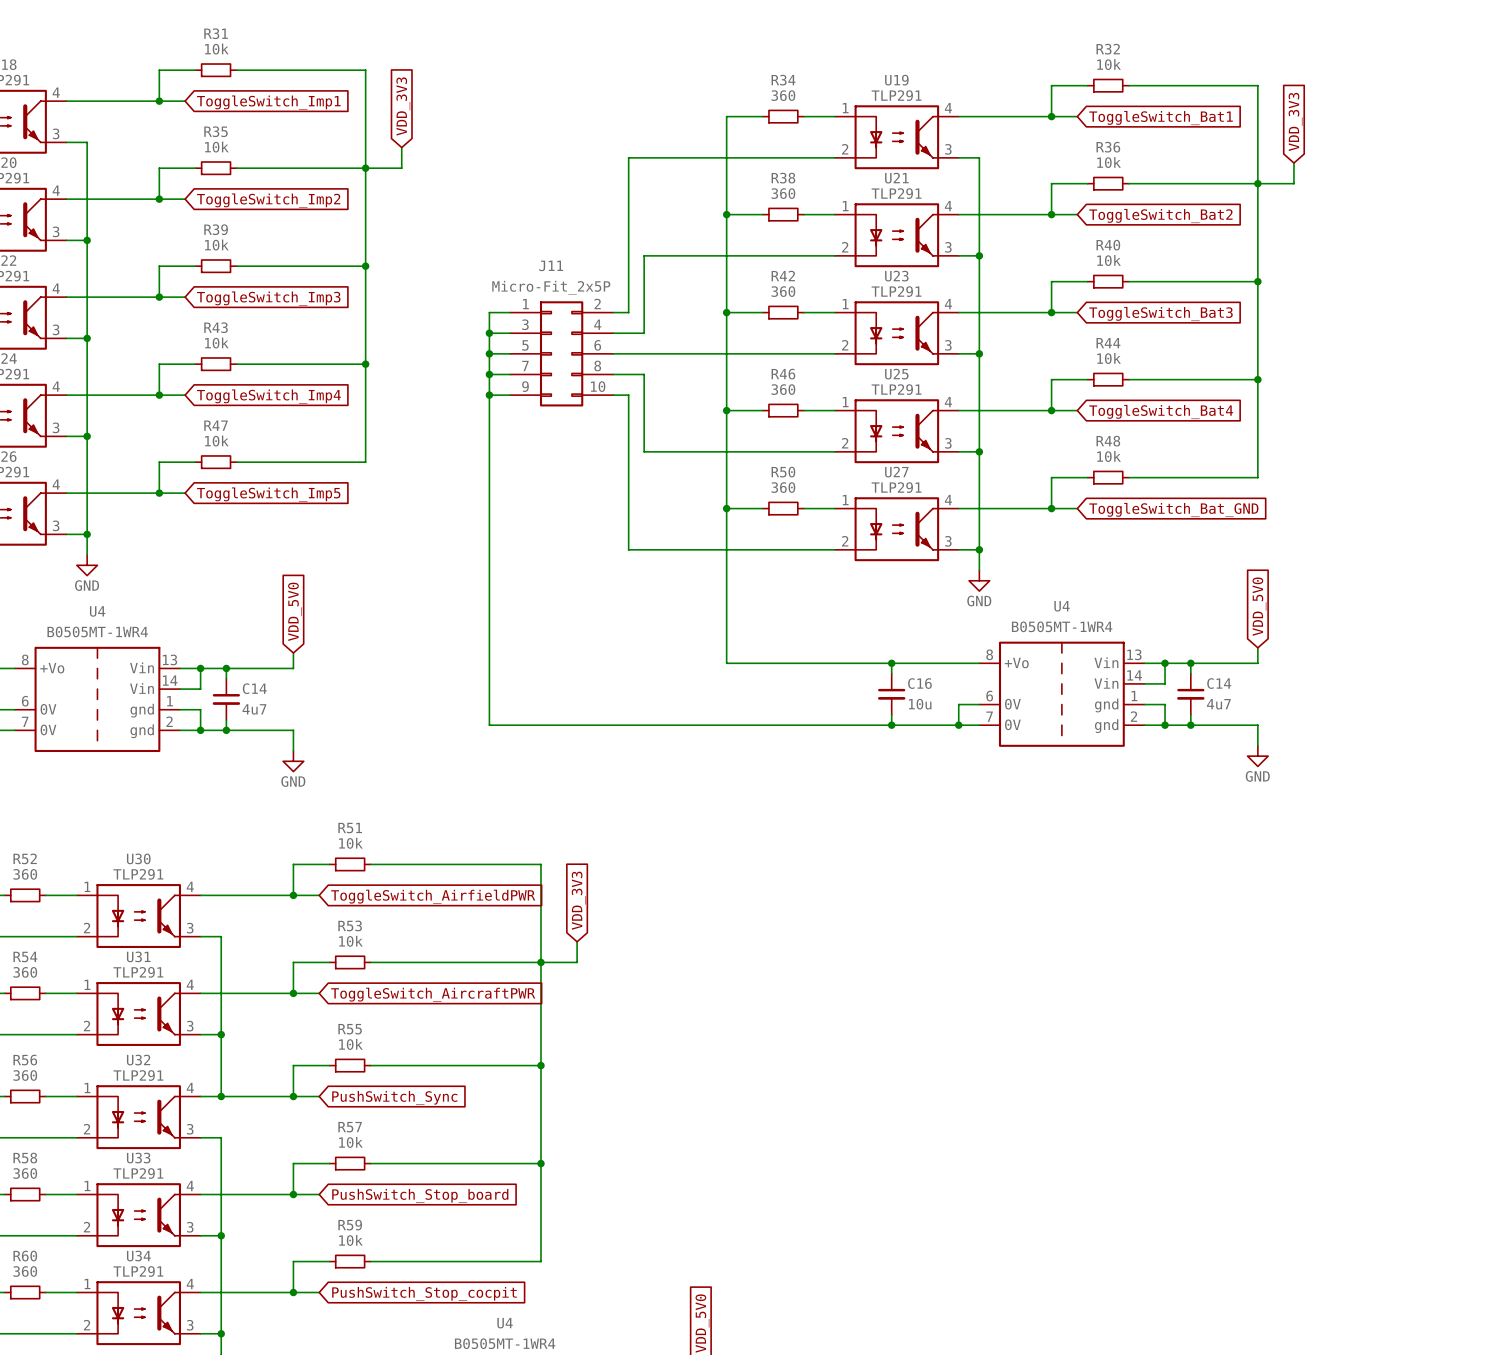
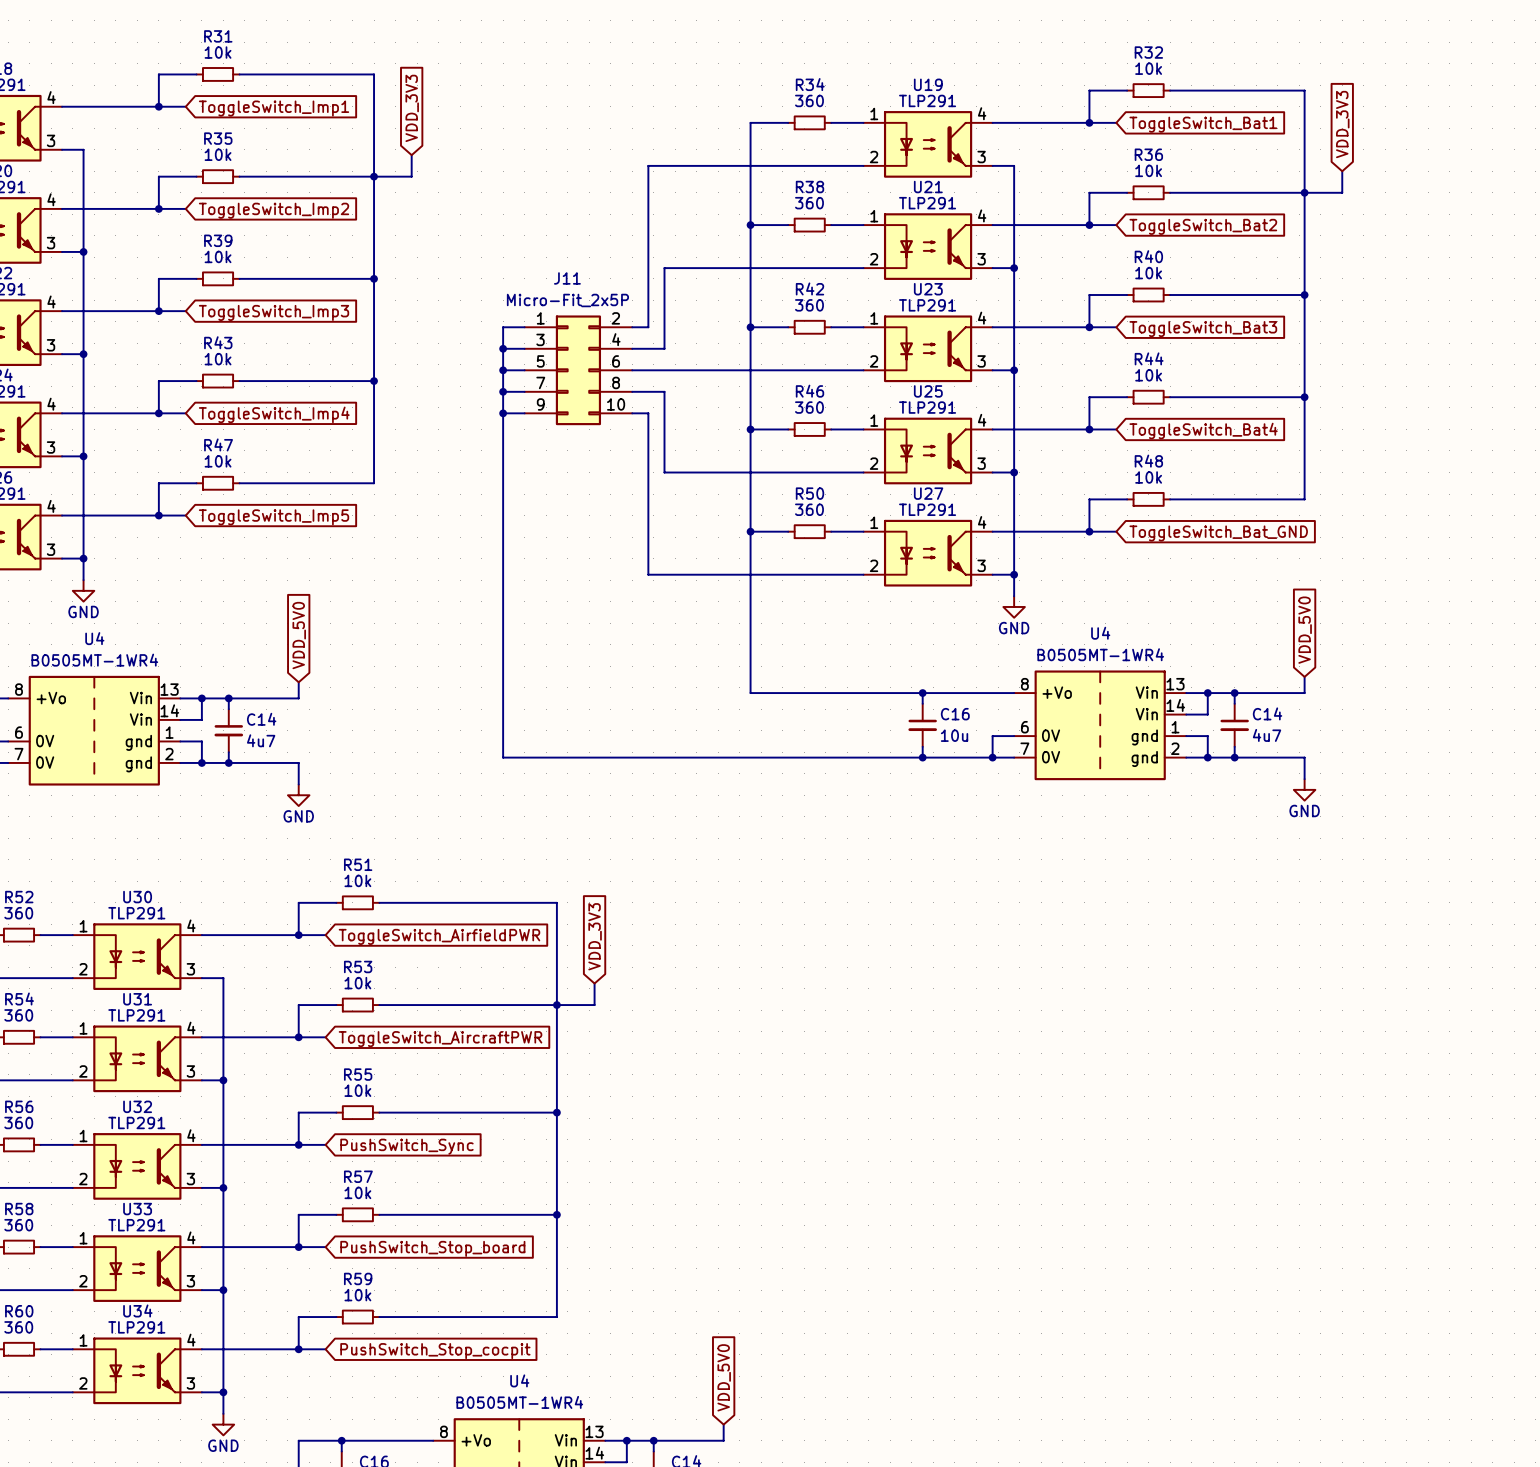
wire: none -> (223, 1144) (223, 1187)
junction position: (221, 1096) -> (223, 1187)

